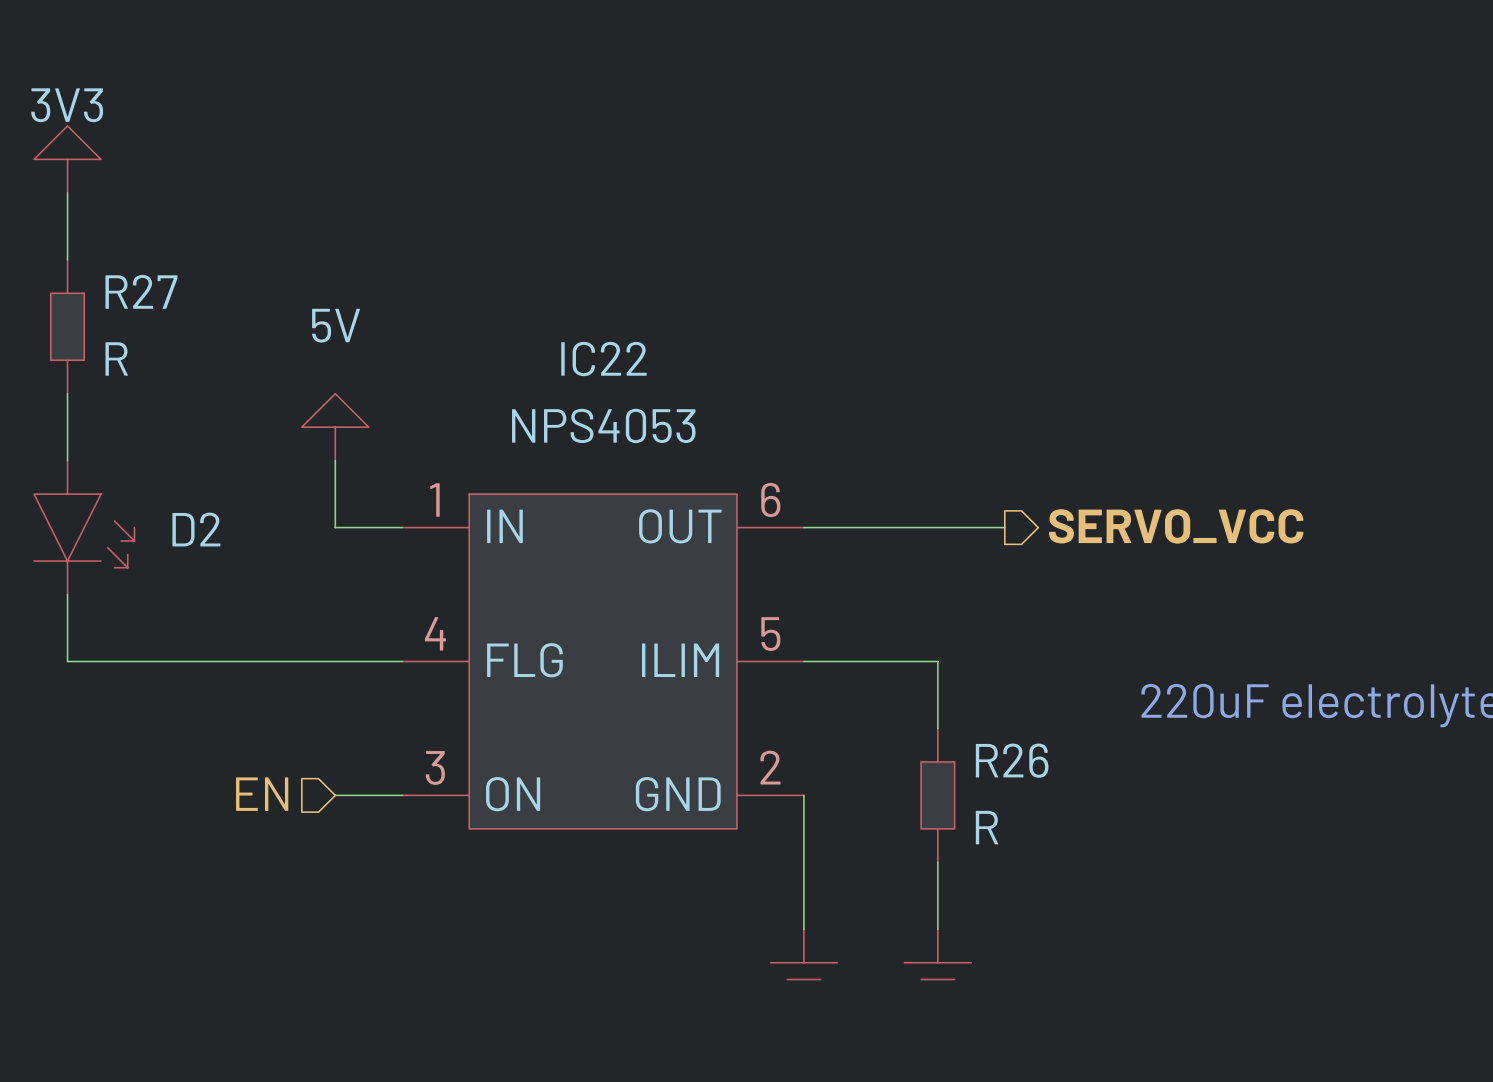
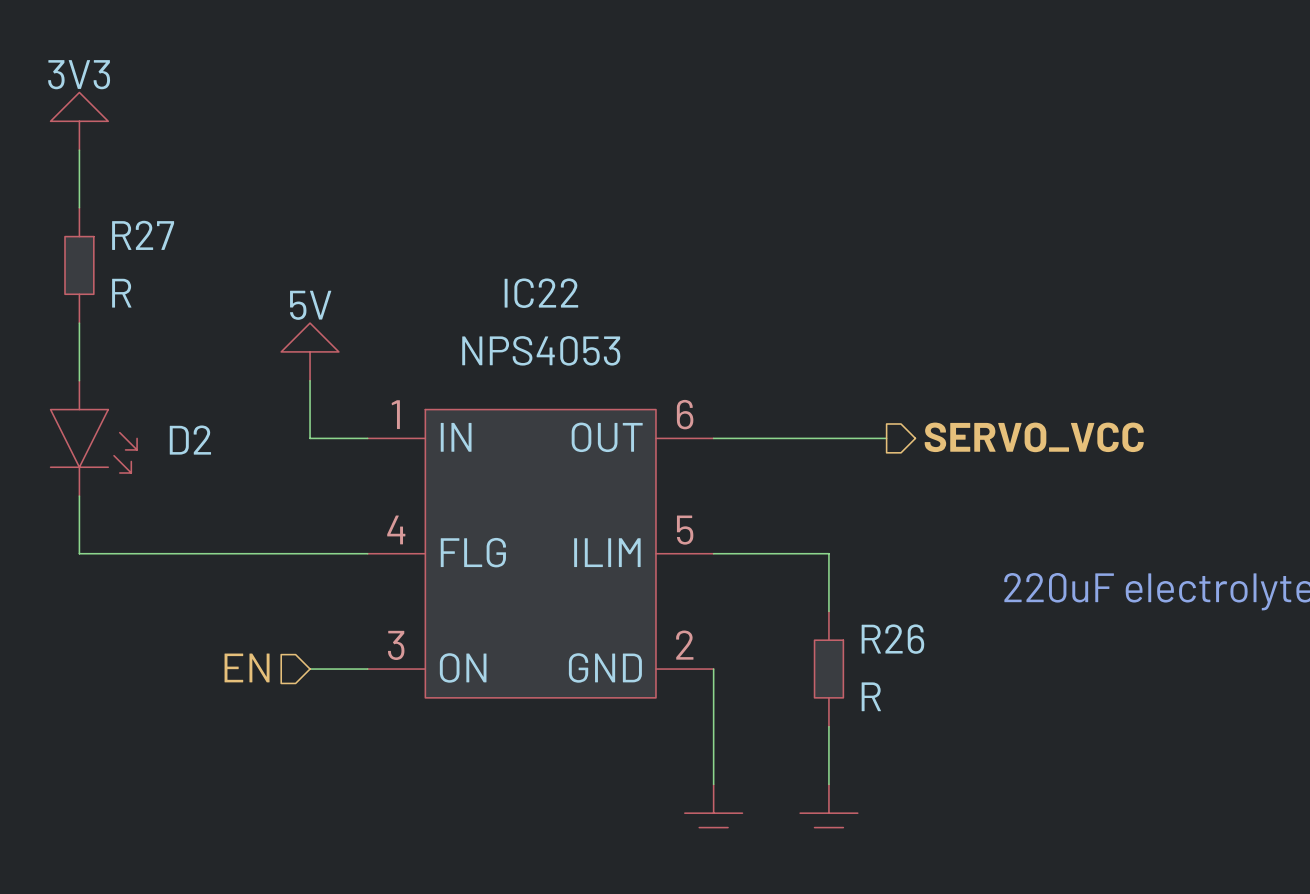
power symbol text position: 5V (336, 325) -> 5V (310, 305)

